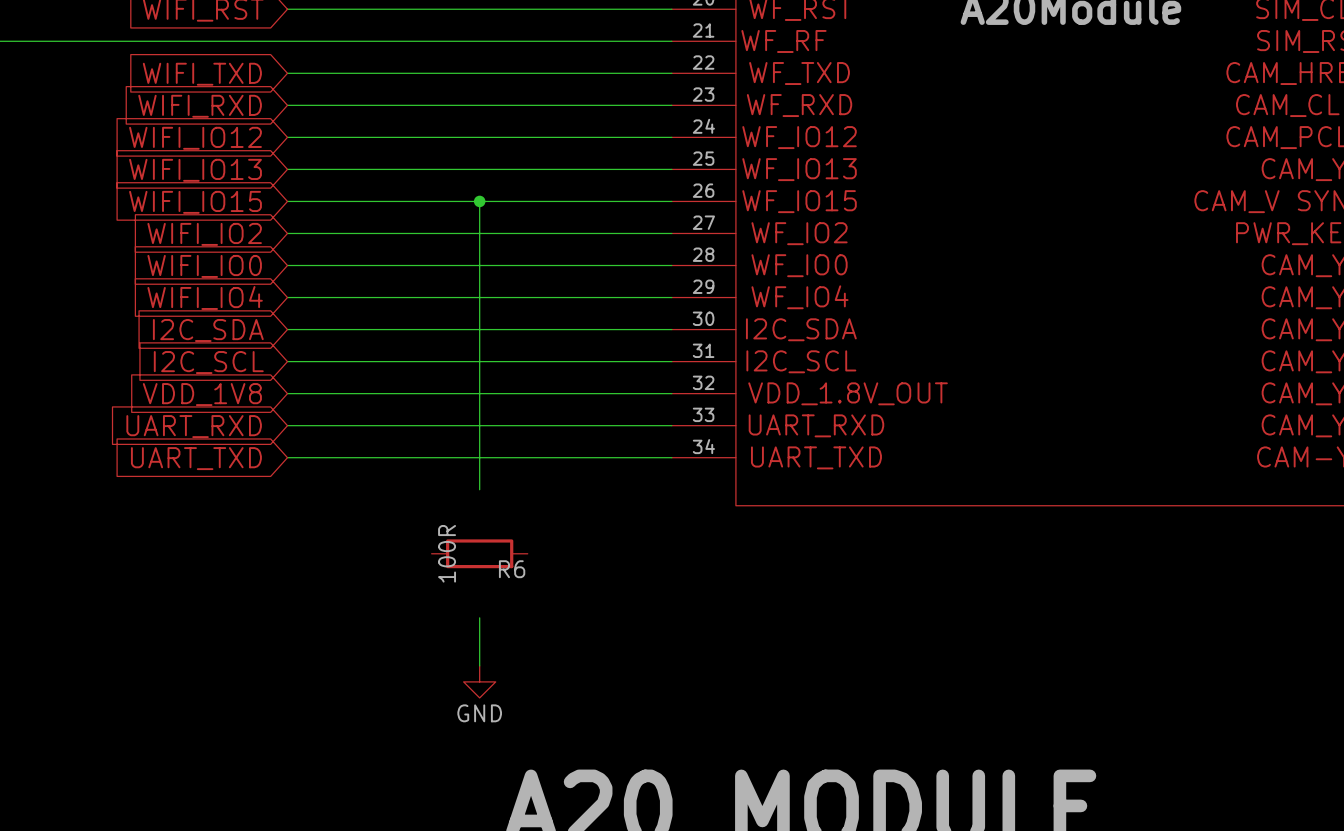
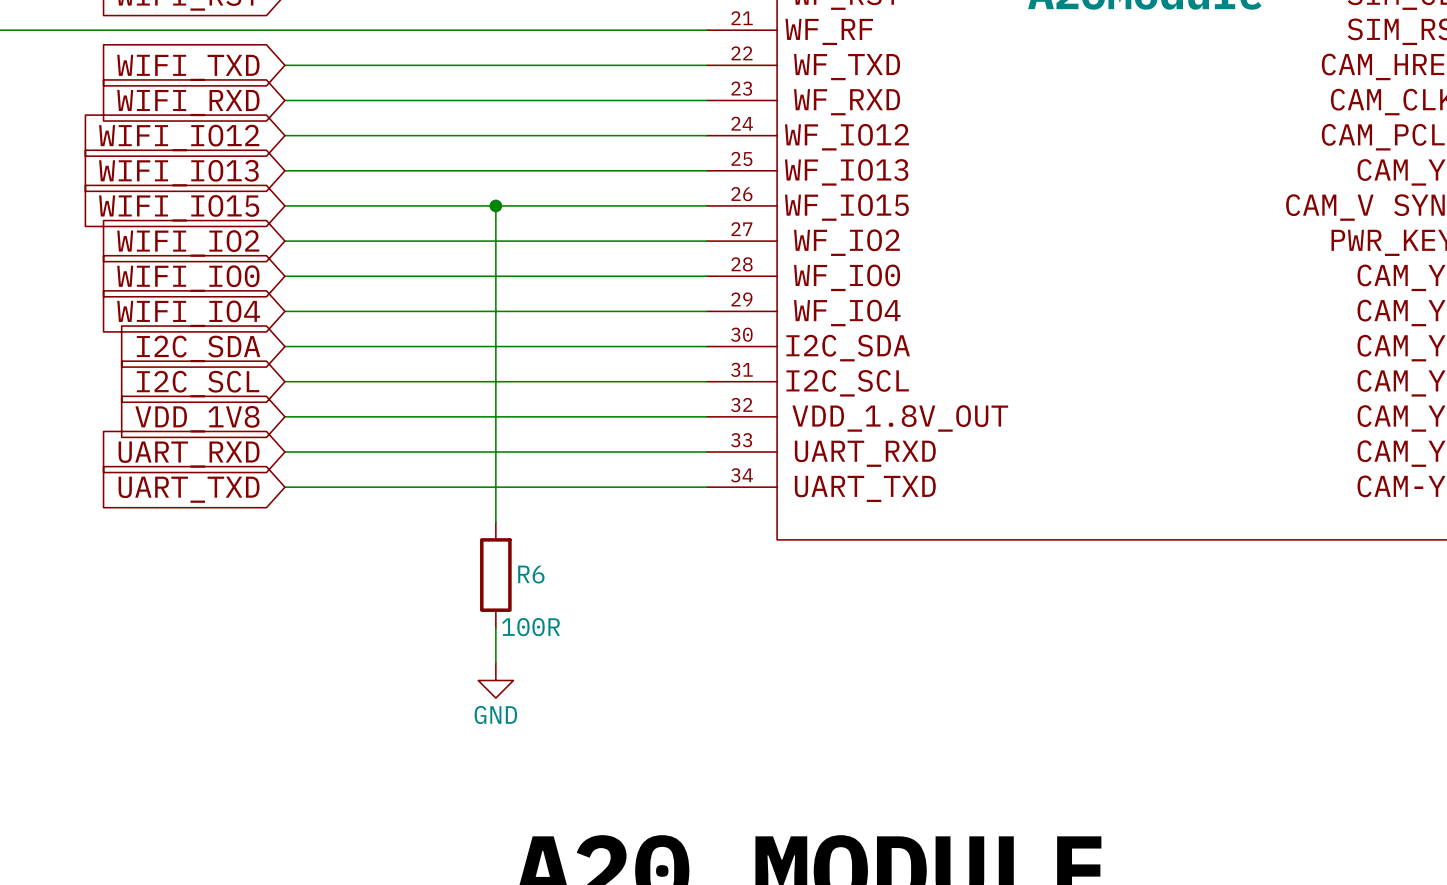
R6 value position: 100R (447, 553) -> 100R (531, 627)
R6 rotation: 0° (479, 553) -> 90° clockwise (495, 575)
wire: (479, 617) (479, 665) -> (495, 662) (495, 627)
power symbol position: GND (479, 681) -> GND (495, 680)

